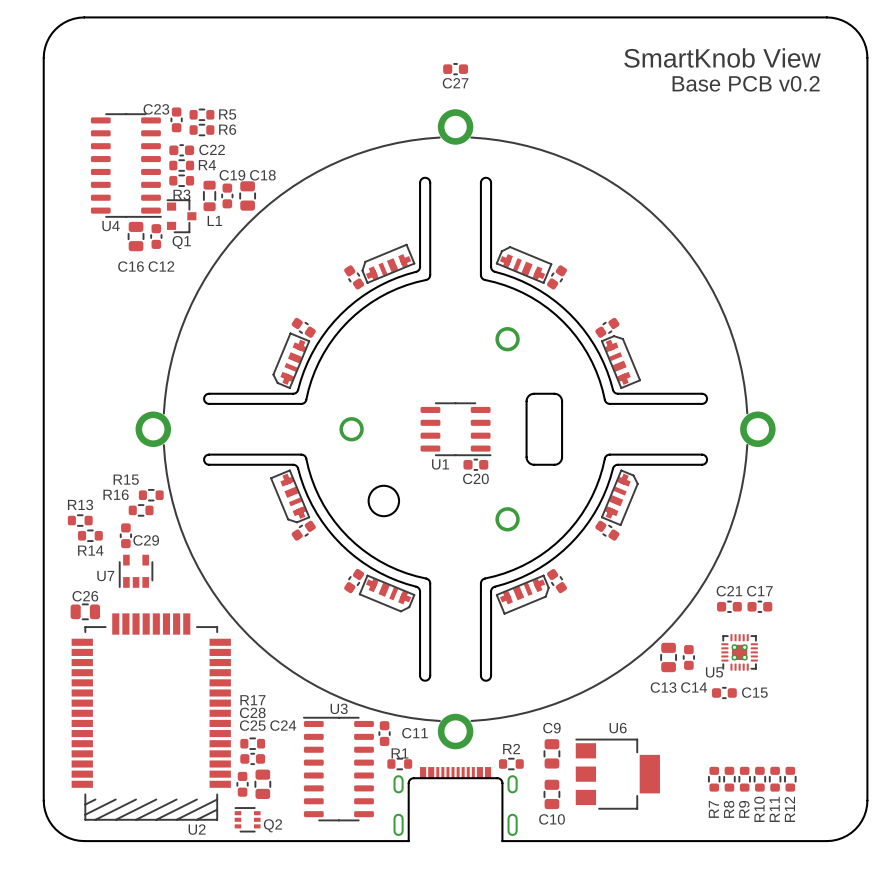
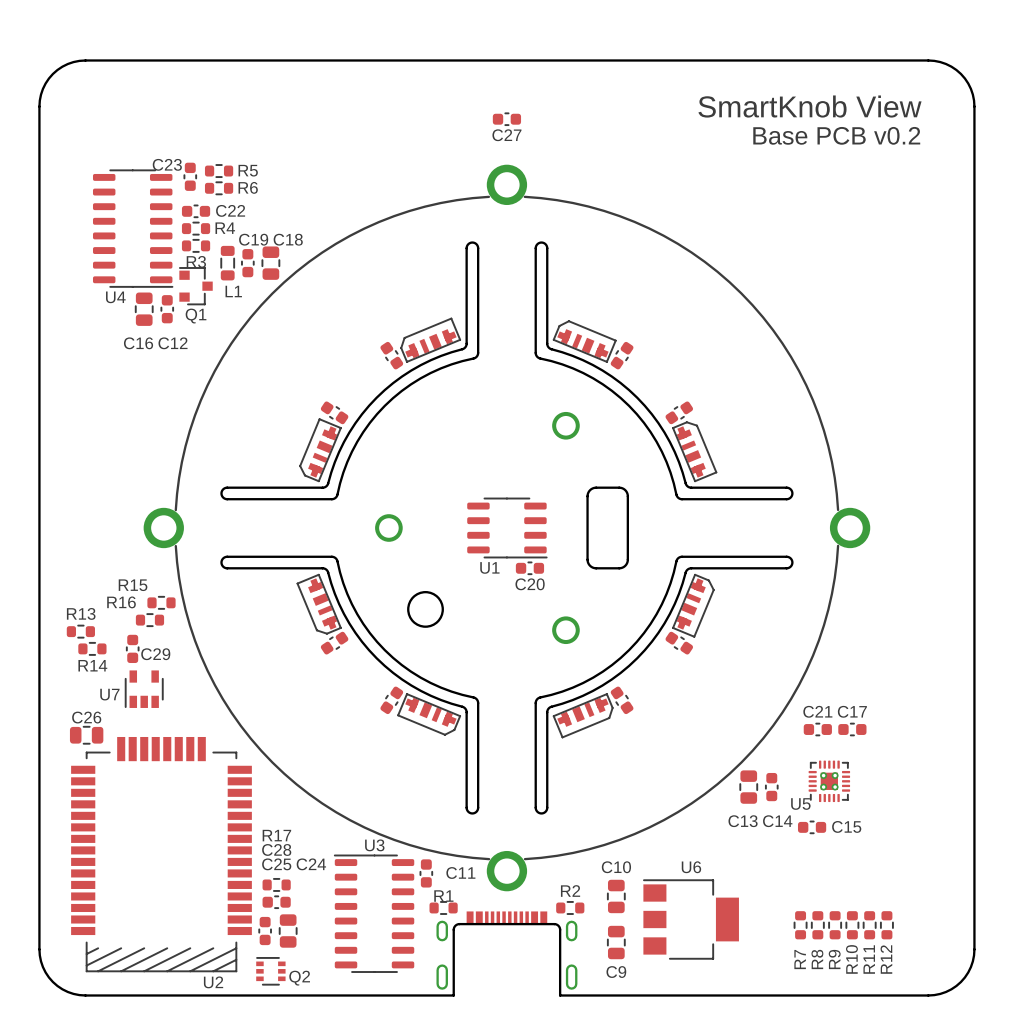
C9 name: C9 (551, 728) -> C10 (616, 867)
C10 name: C10 (552, 819) -> C9 (616, 972)

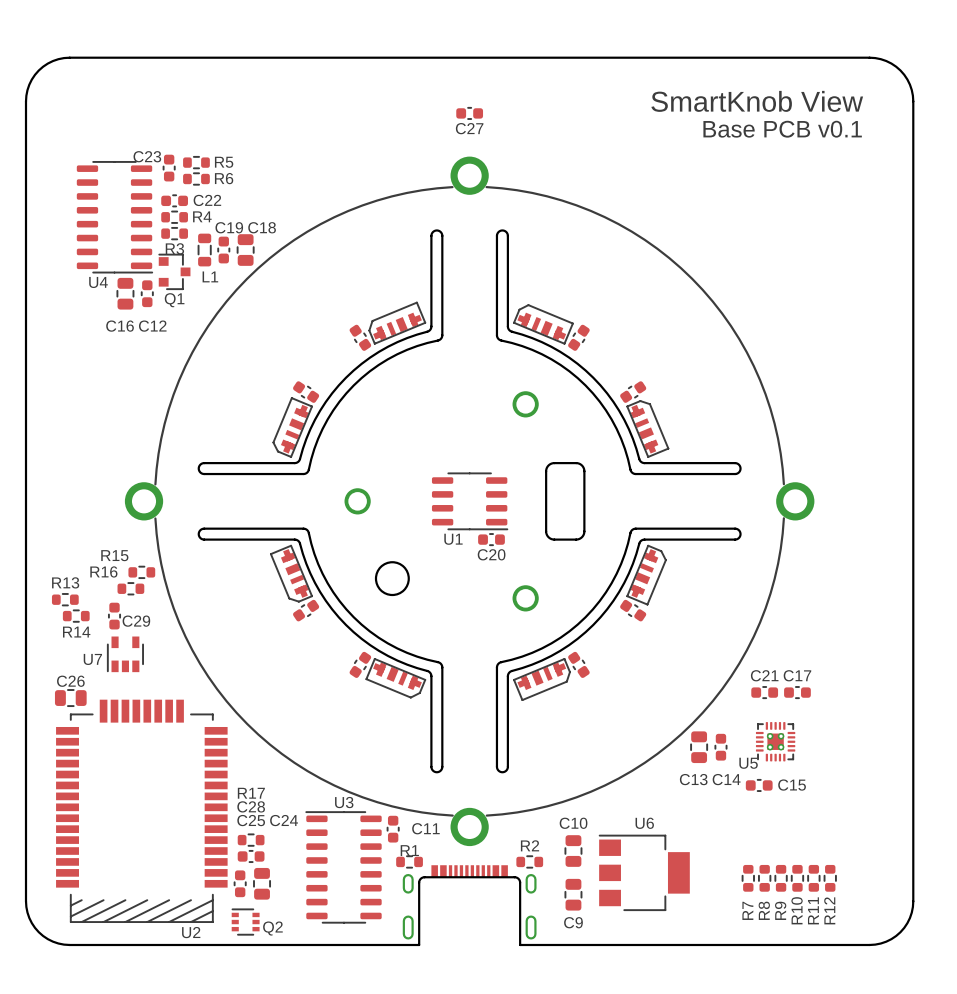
text: Base PCB v0.2 (836, 135) -> Base PCB v0.1 (782, 129)

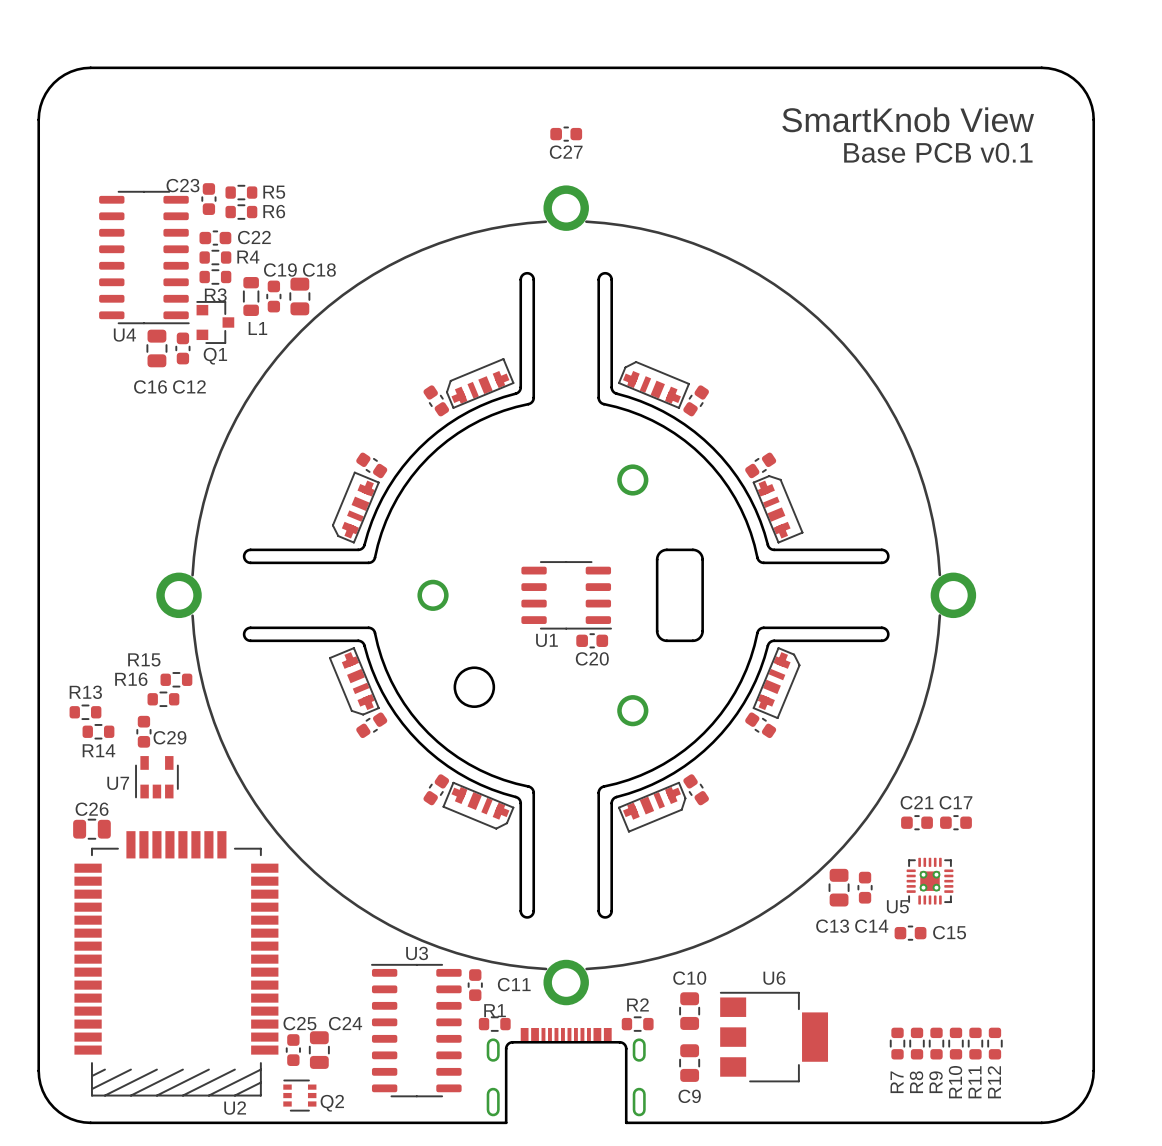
C25 name position: C25 (251, 820) -> C25 (299, 1023)
C24 name position: C24 (284, 820) -> C24 (345, 1023)
R17: (251, 840) -> none
C28: (251, 856) -> none

